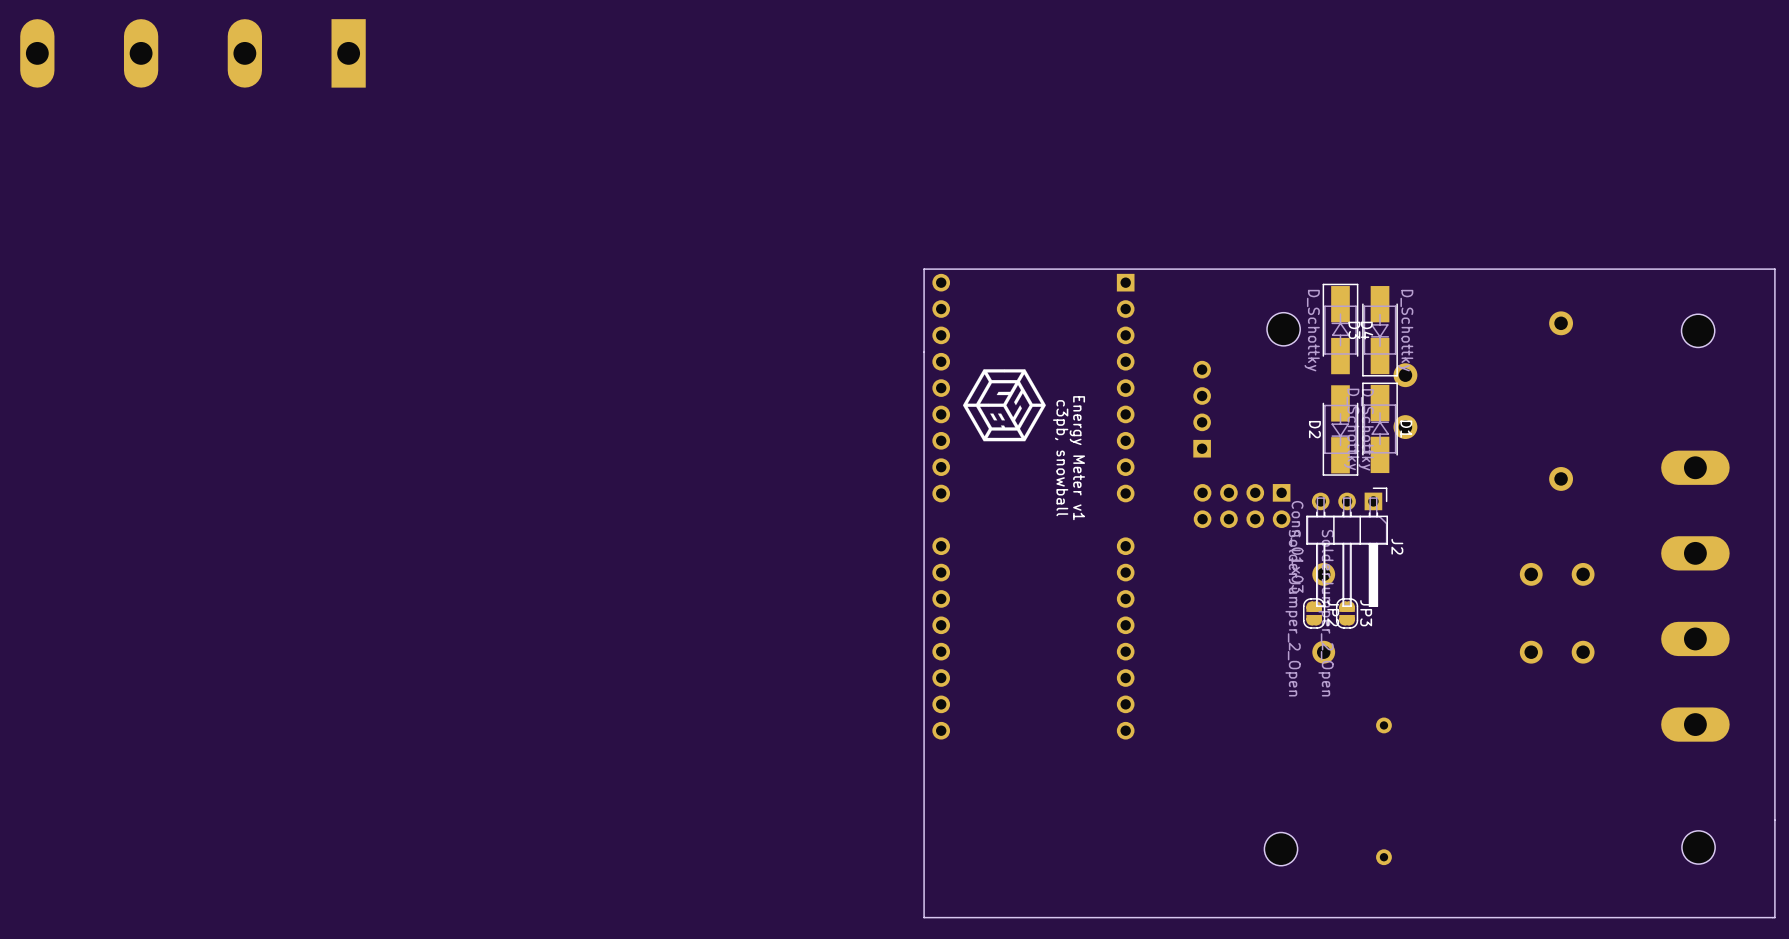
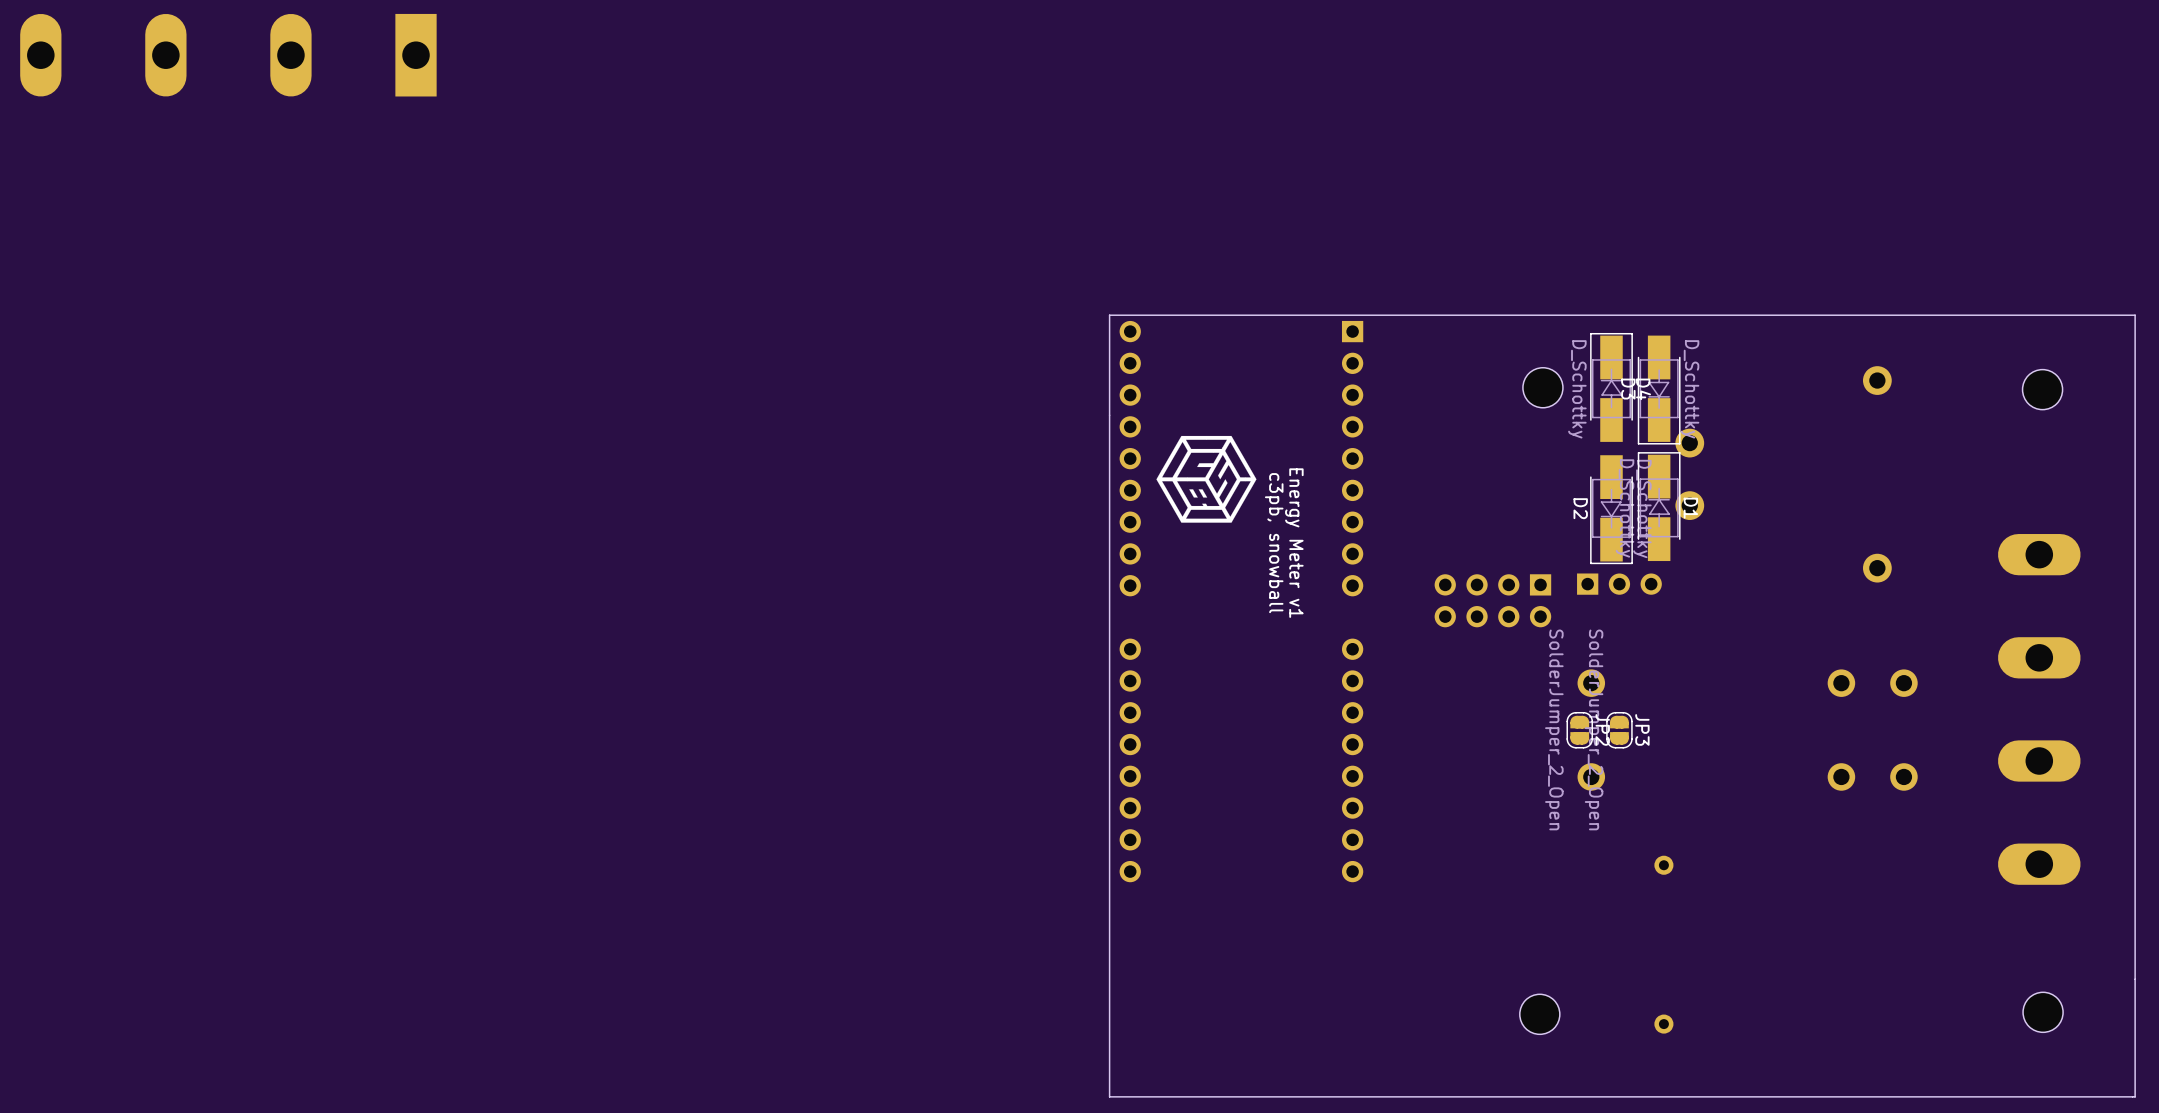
part: (1202, 409) -> none
J2 side: bottom (1347, 547) -> top (1619, 584)

